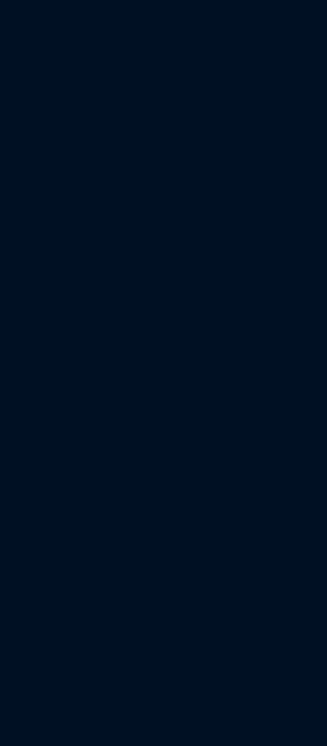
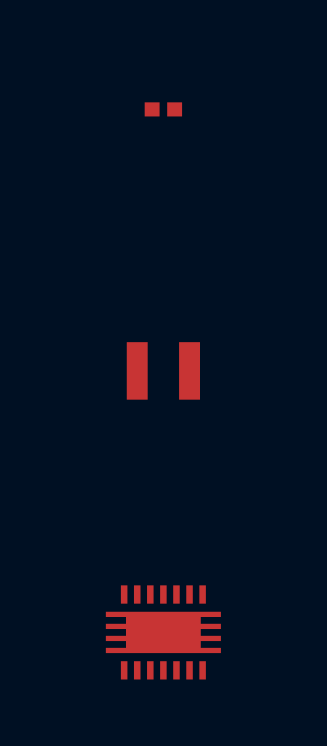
part: none -> (163, 109)
part: none -> (163, 370)
part: none -> (163, 632)

